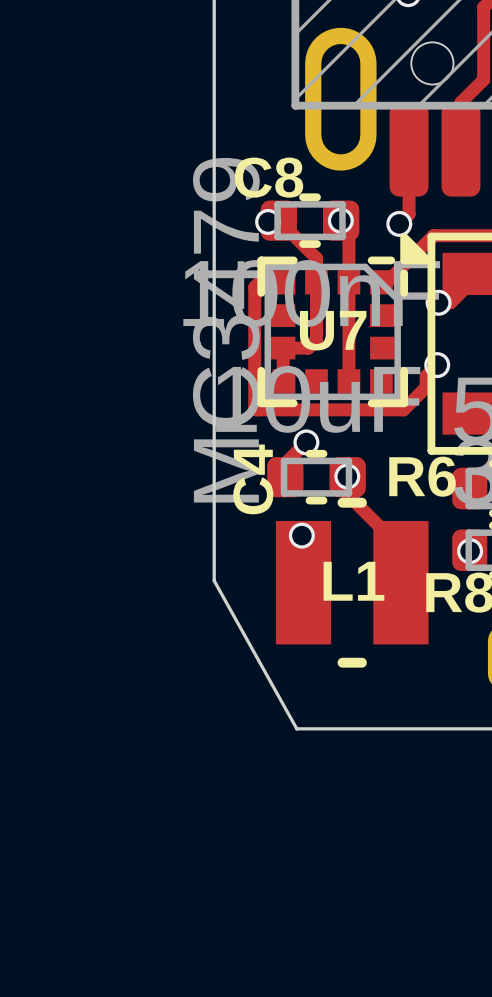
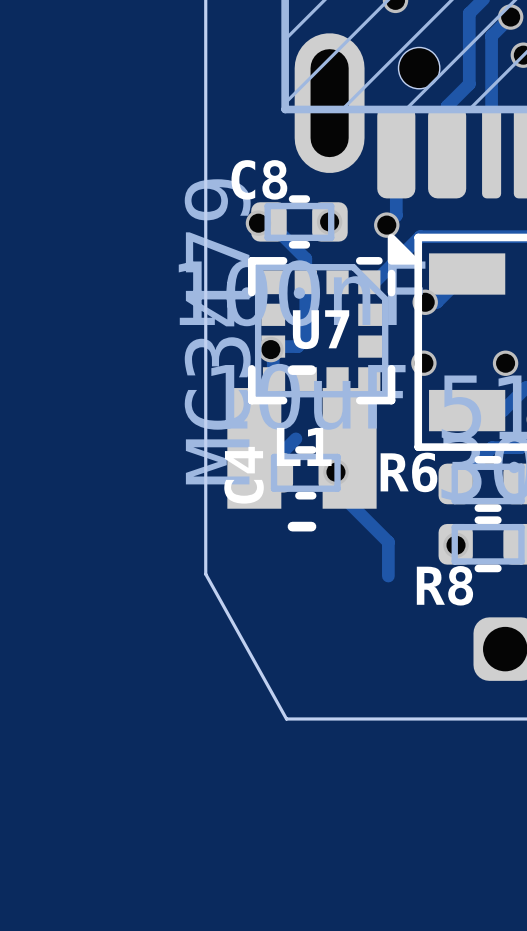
track: (340, 220) (348, 228) (348, 381) -> none
track: (284, 282) (259, 282) (254, 287) (254, 408) (256, 409) (403, 409) (426, 387) (426, 376) (437, 365) -> none
via: none -> (270, 349)
via: (306, 442) -> none
via: (301, 535) -> none
L1 position: (352, 582) -> (301, 448)

